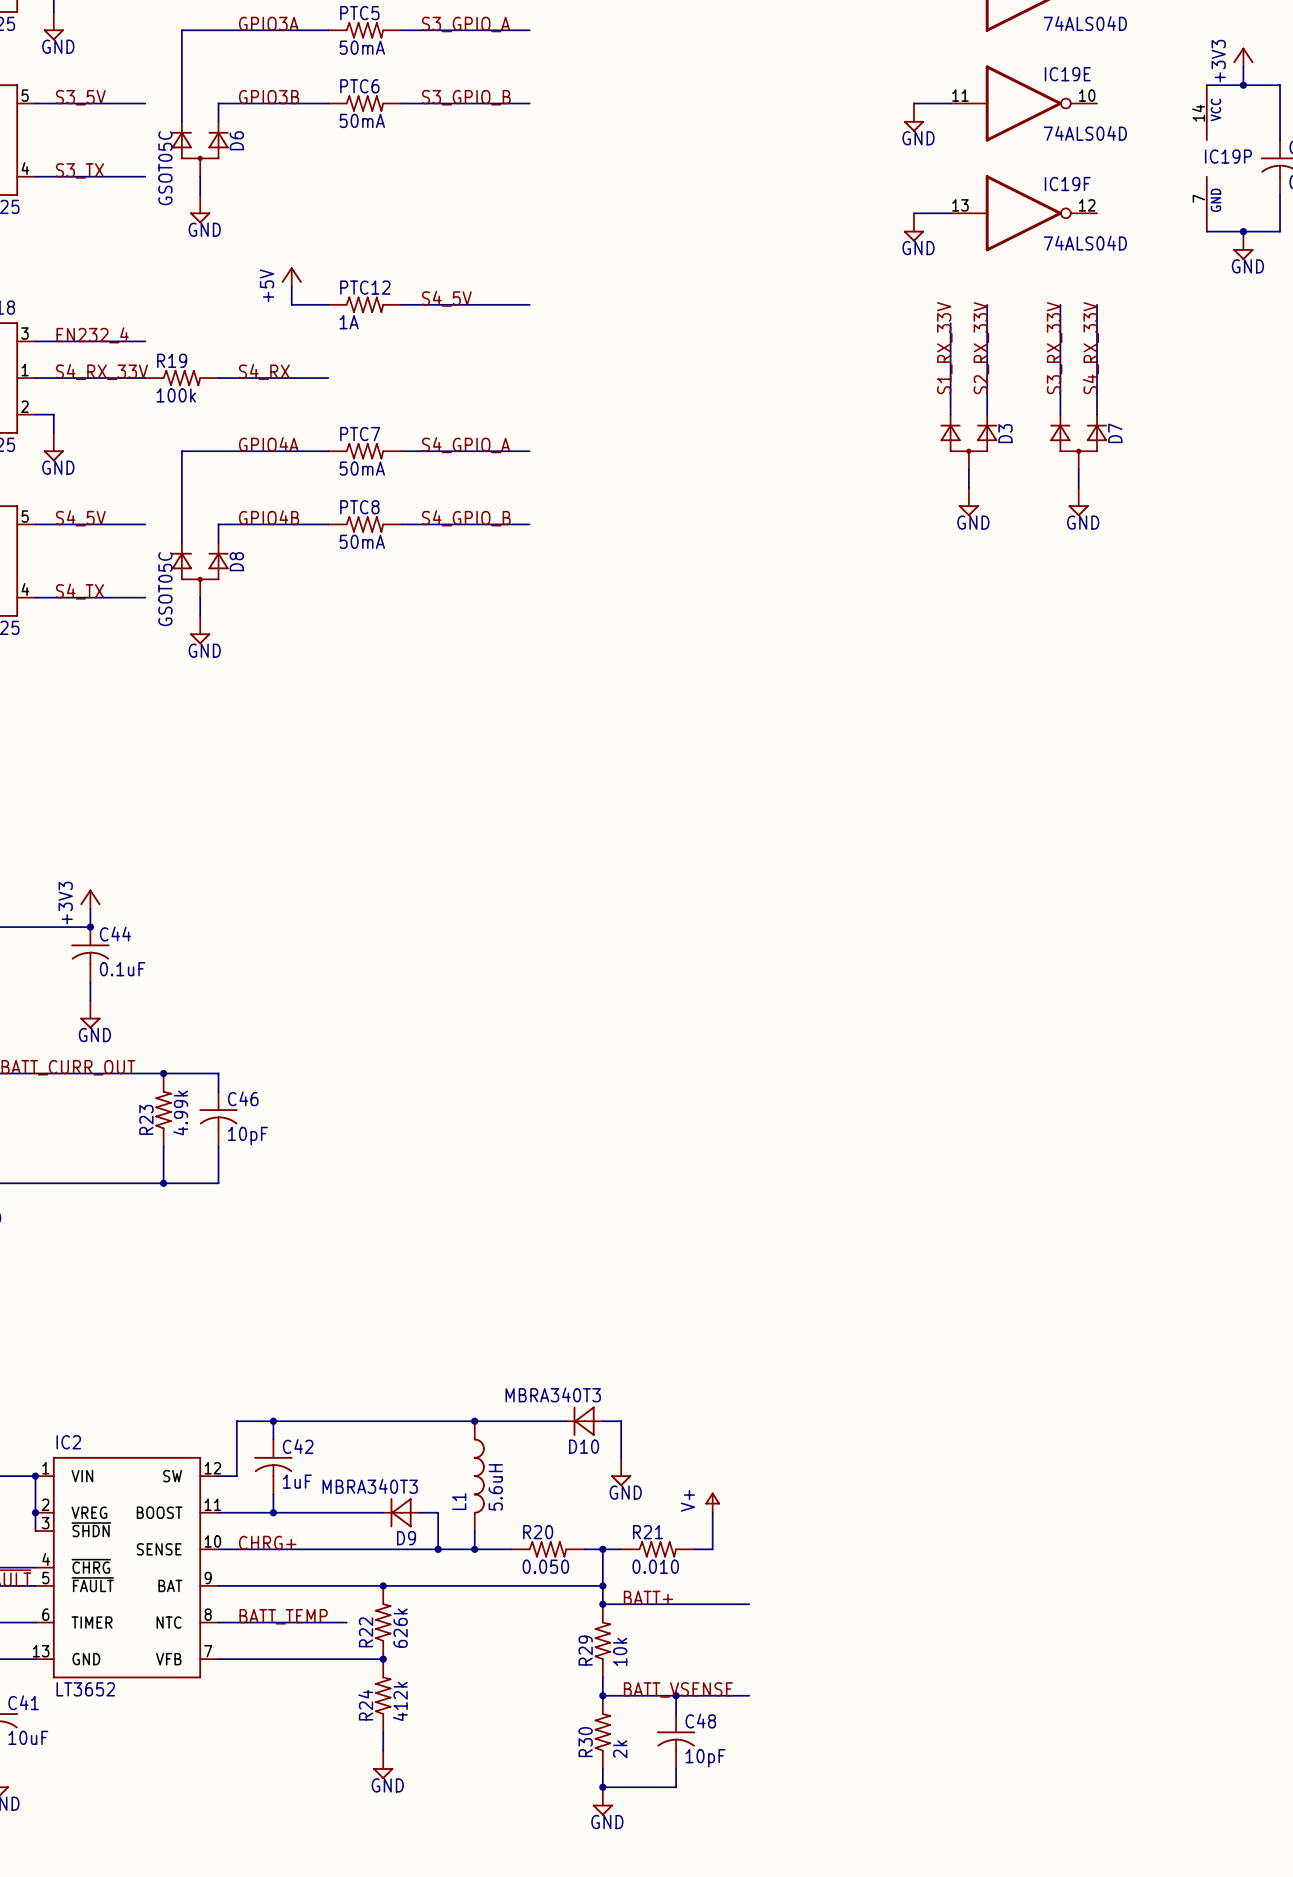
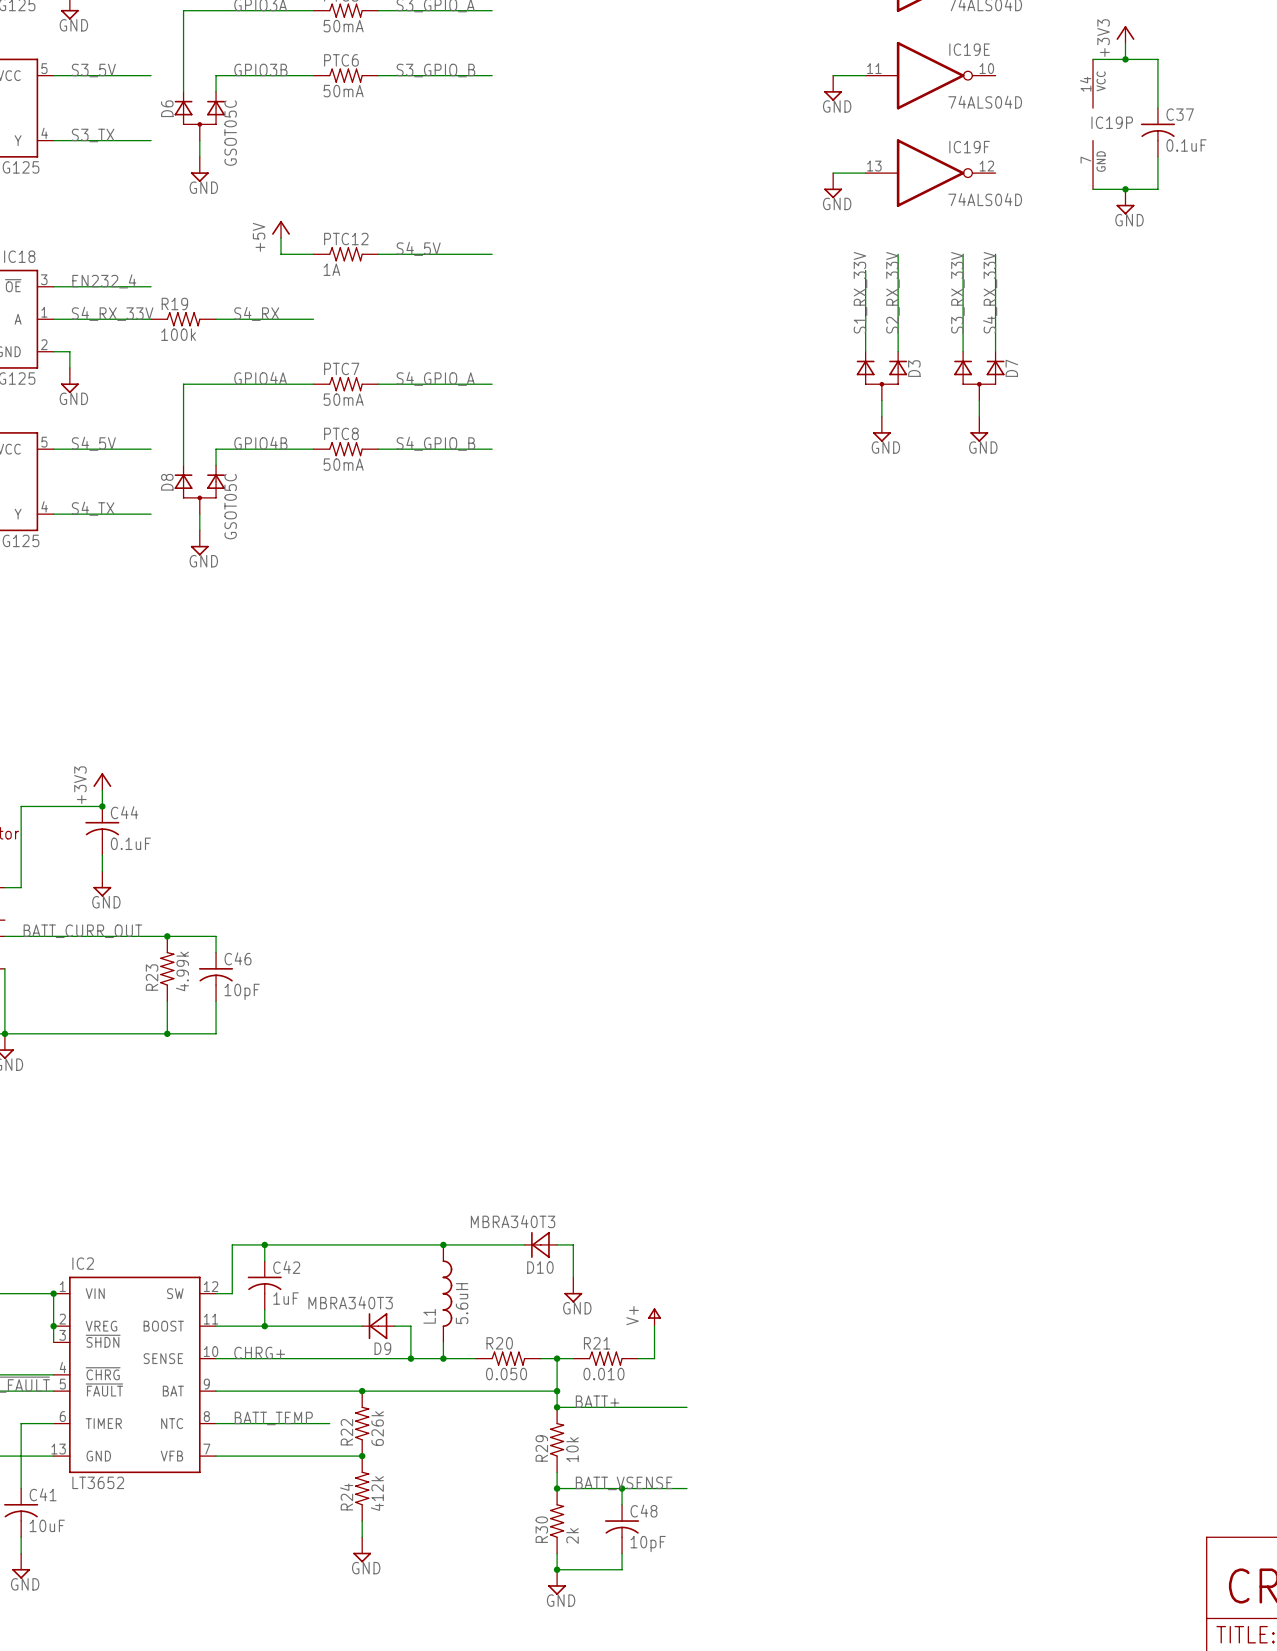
D6 name position: D6 (236, 140) -> D6 (167, 108)
D6 value position: GSOT05C (165, 168) -> GSOT05C (230, 133)
D8 name position: D8 (236, 561) -> D8 (167, 482)
D8 value position: GSOT05C (165, 589) -> GSOT05C (230, 506)

